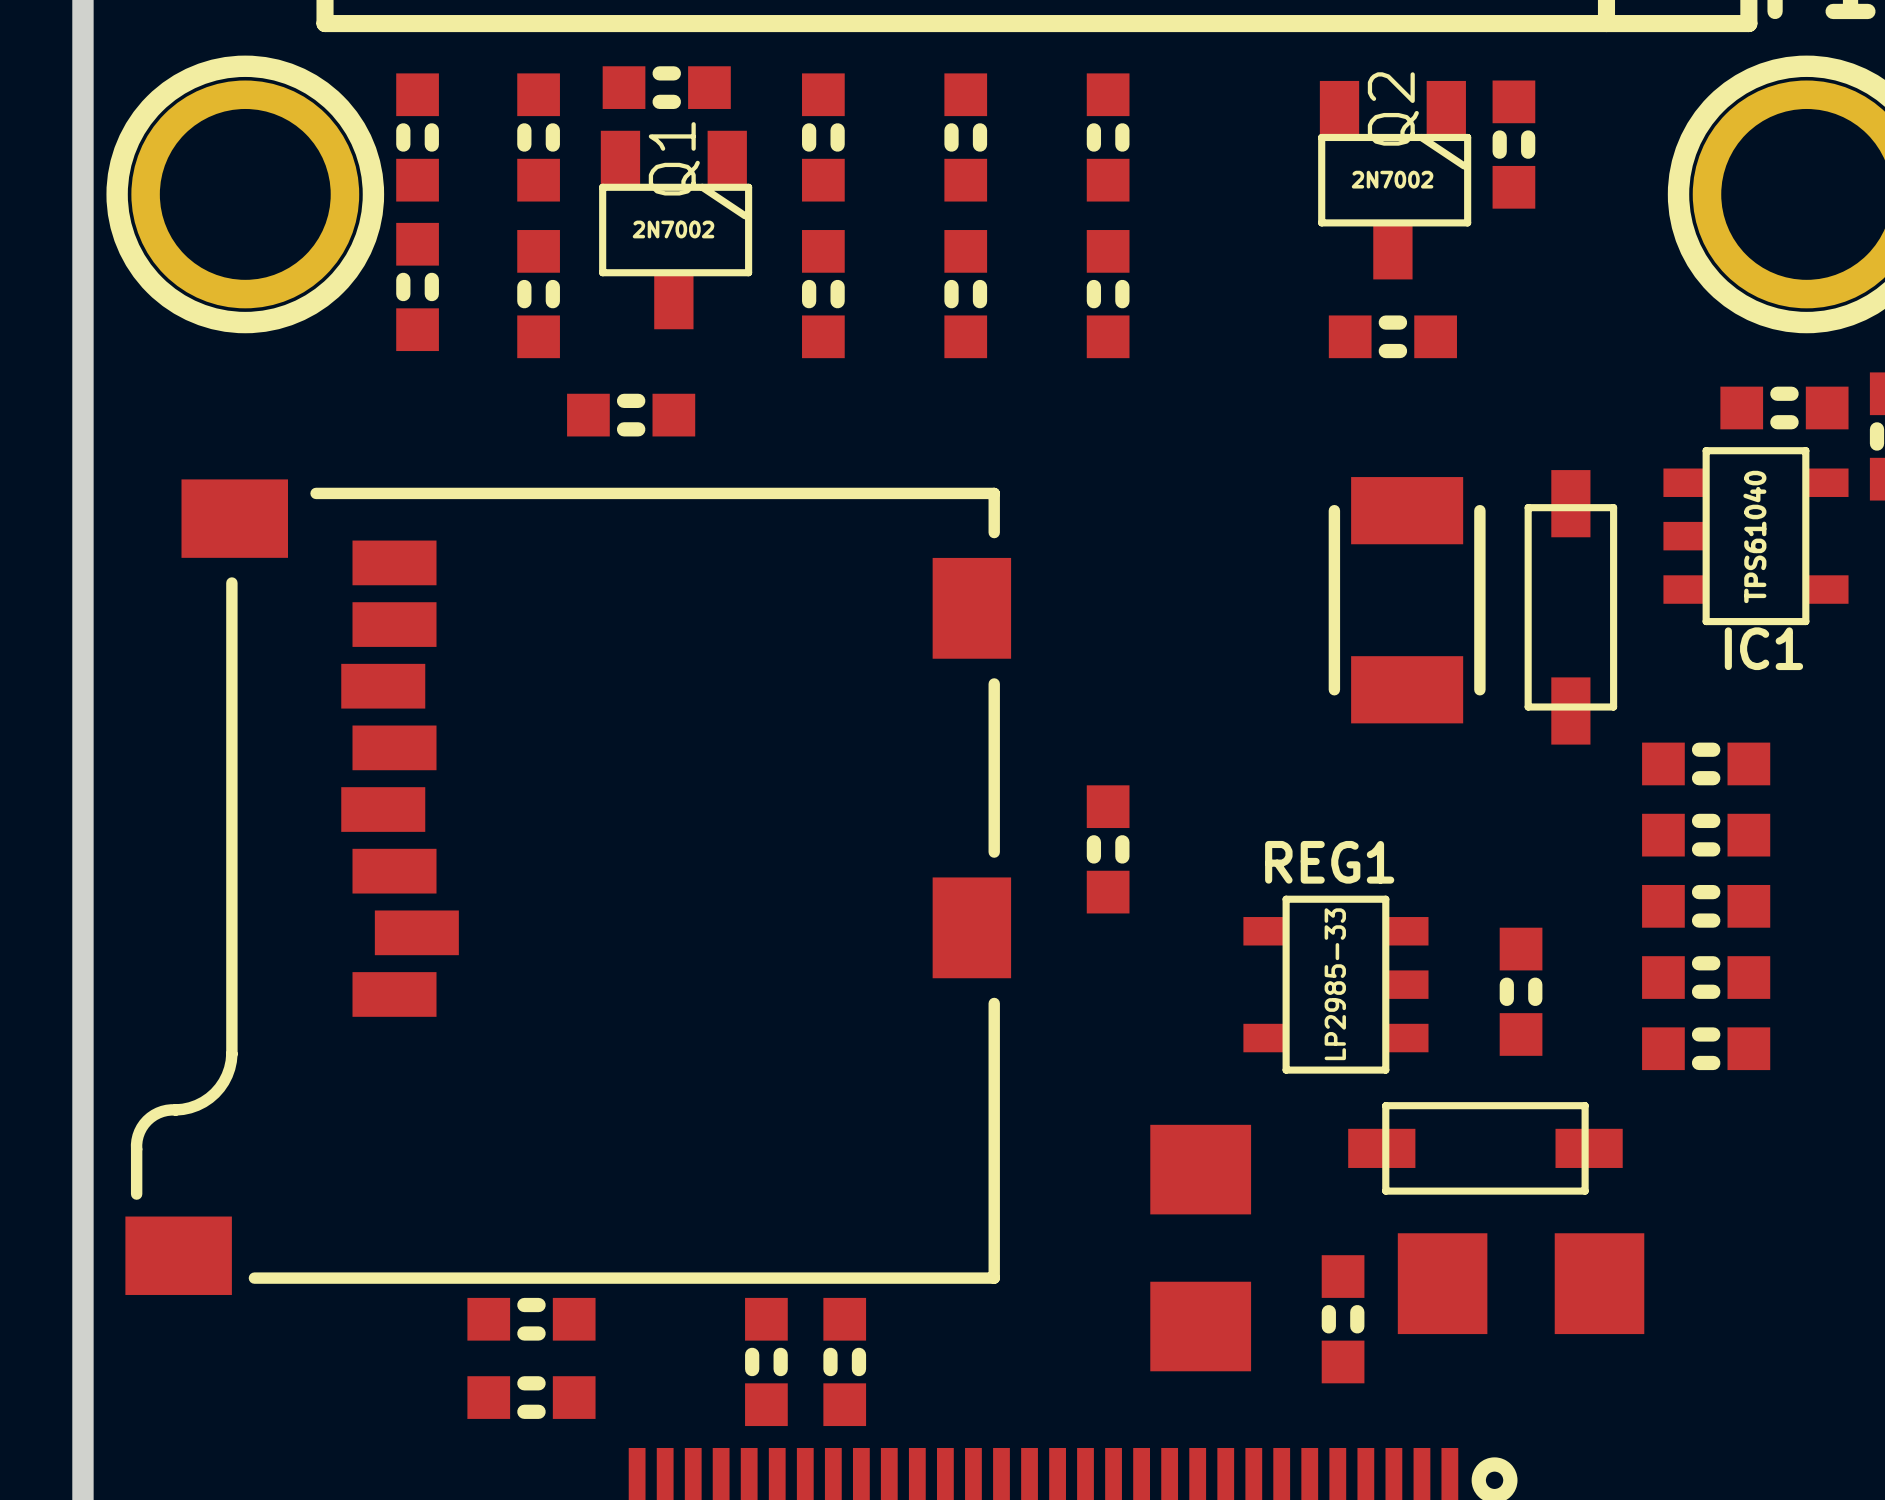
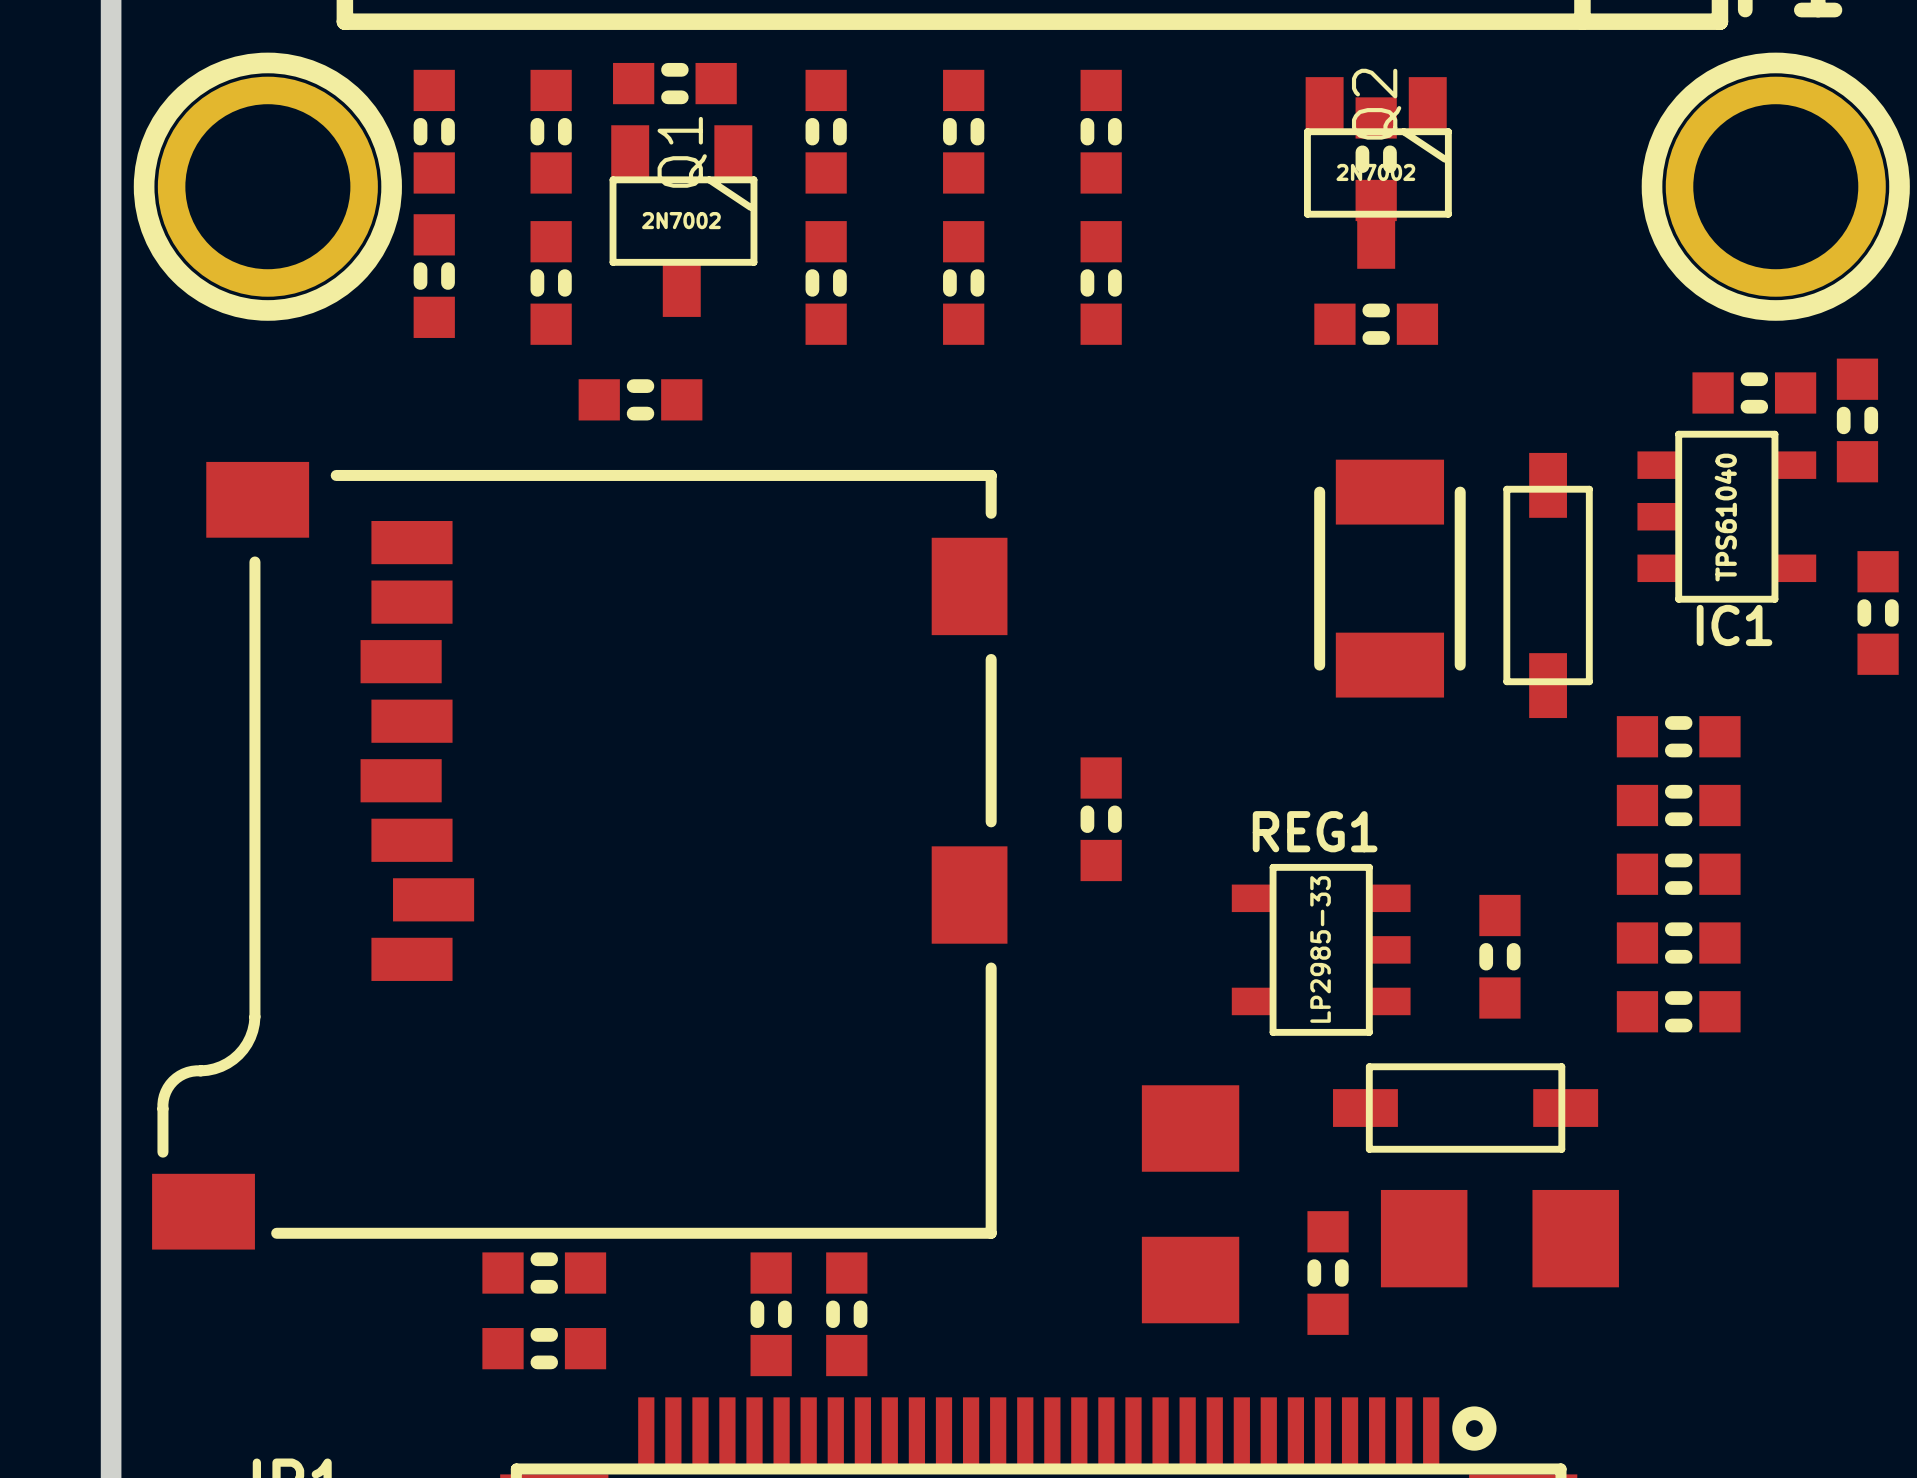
part position: (1513, 144) -> (1376, 159)

